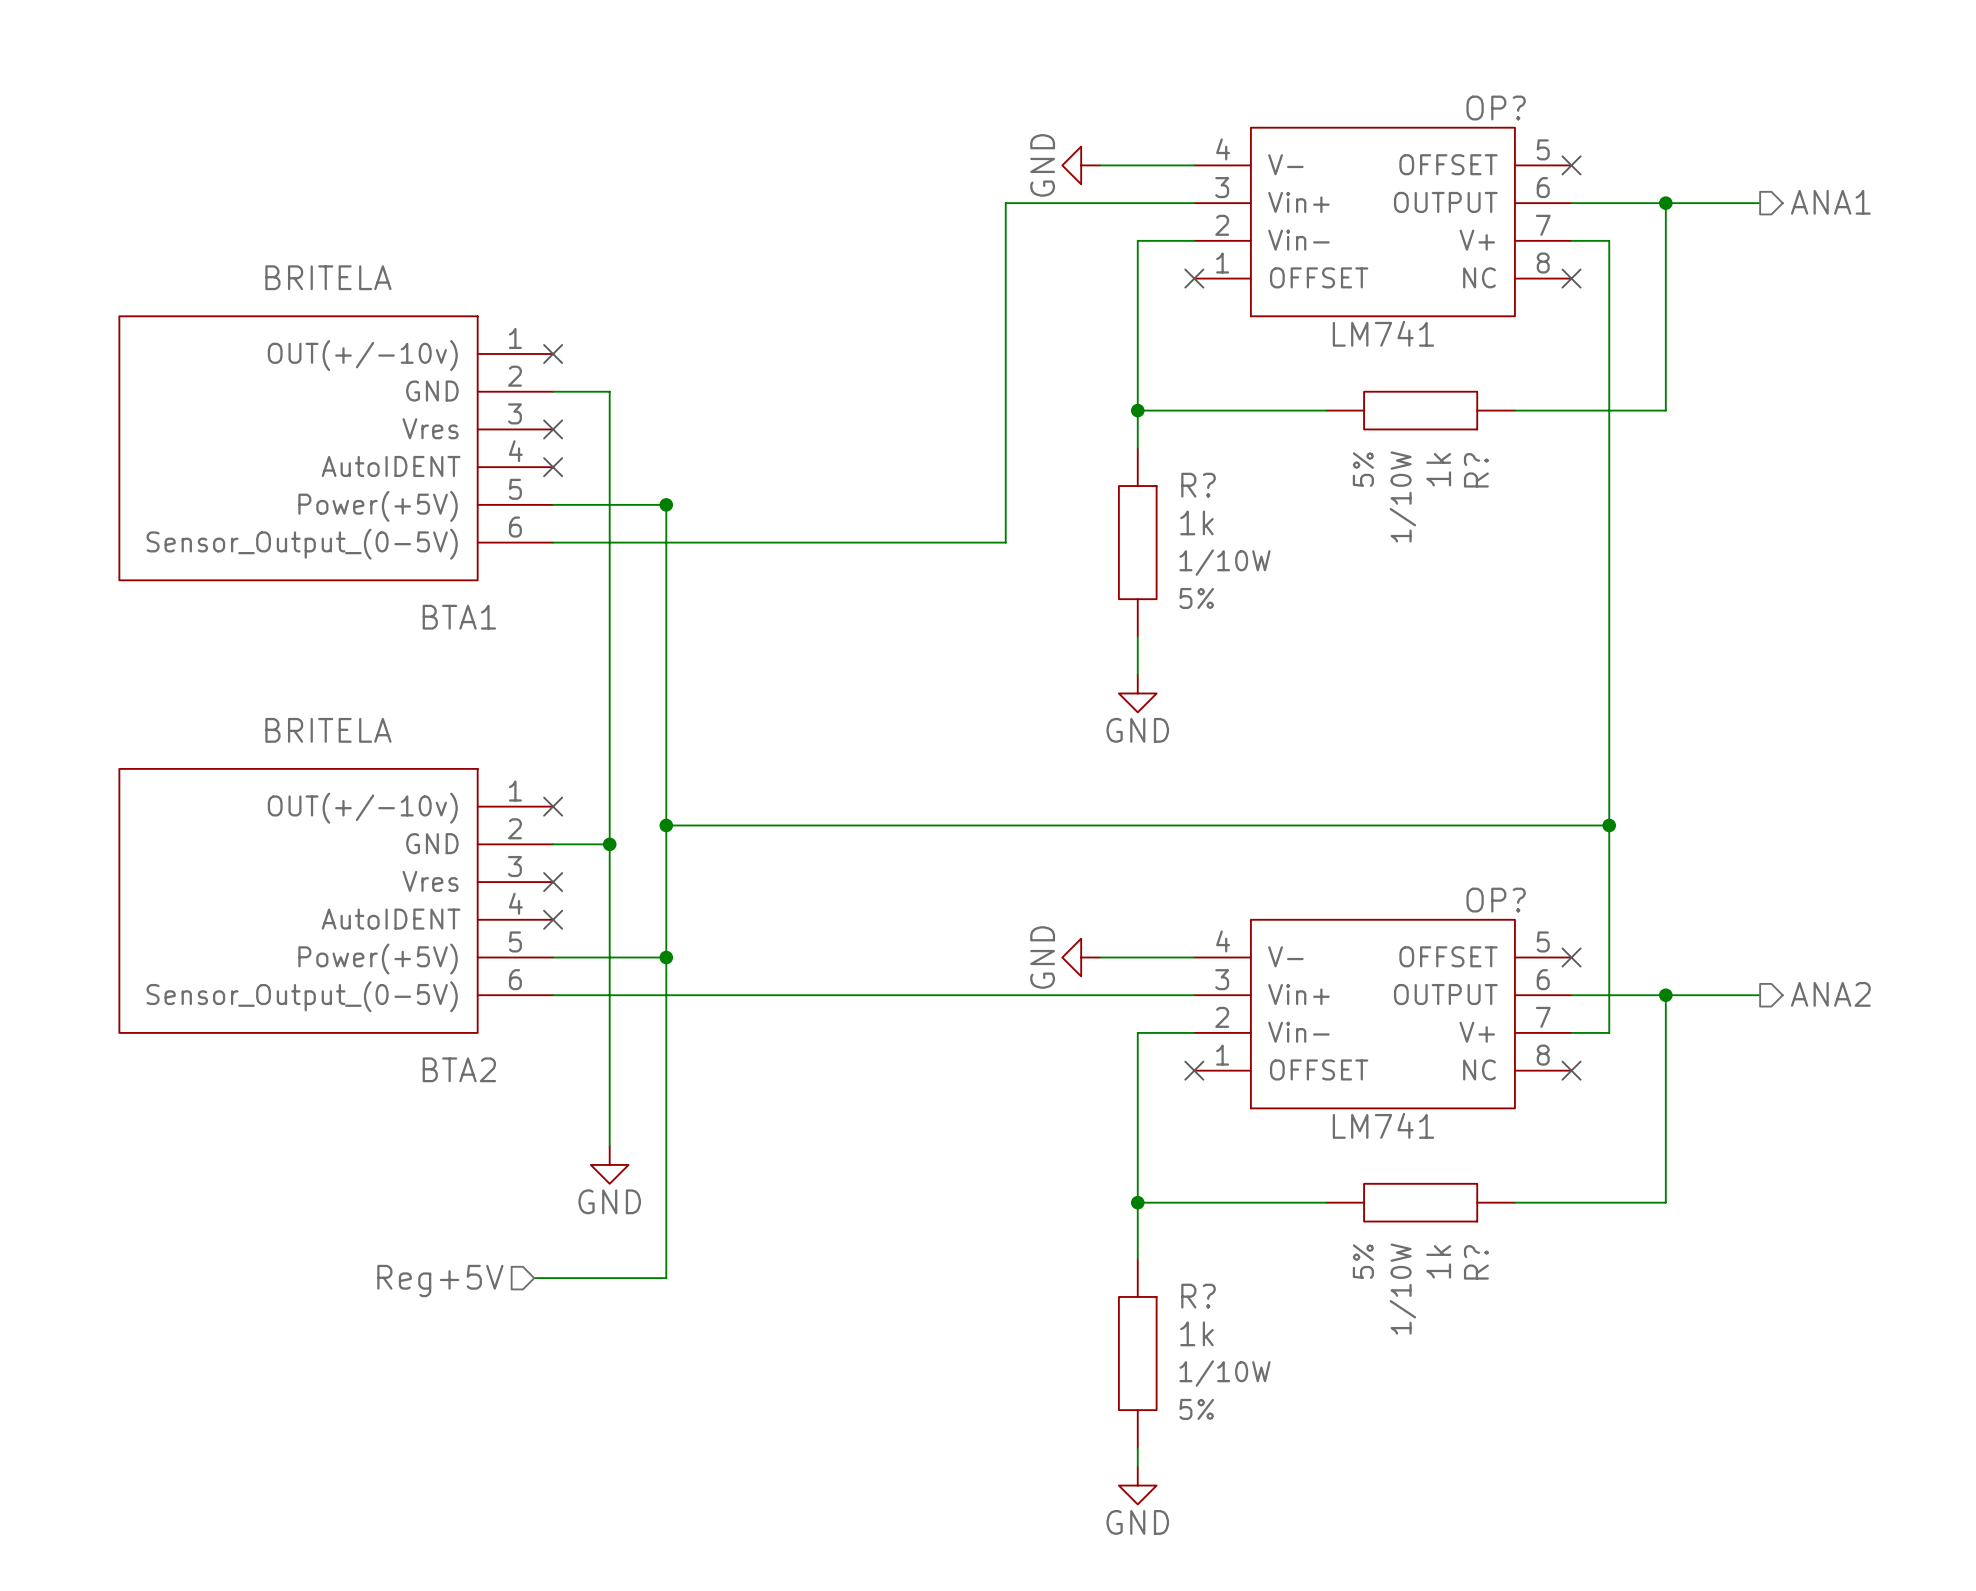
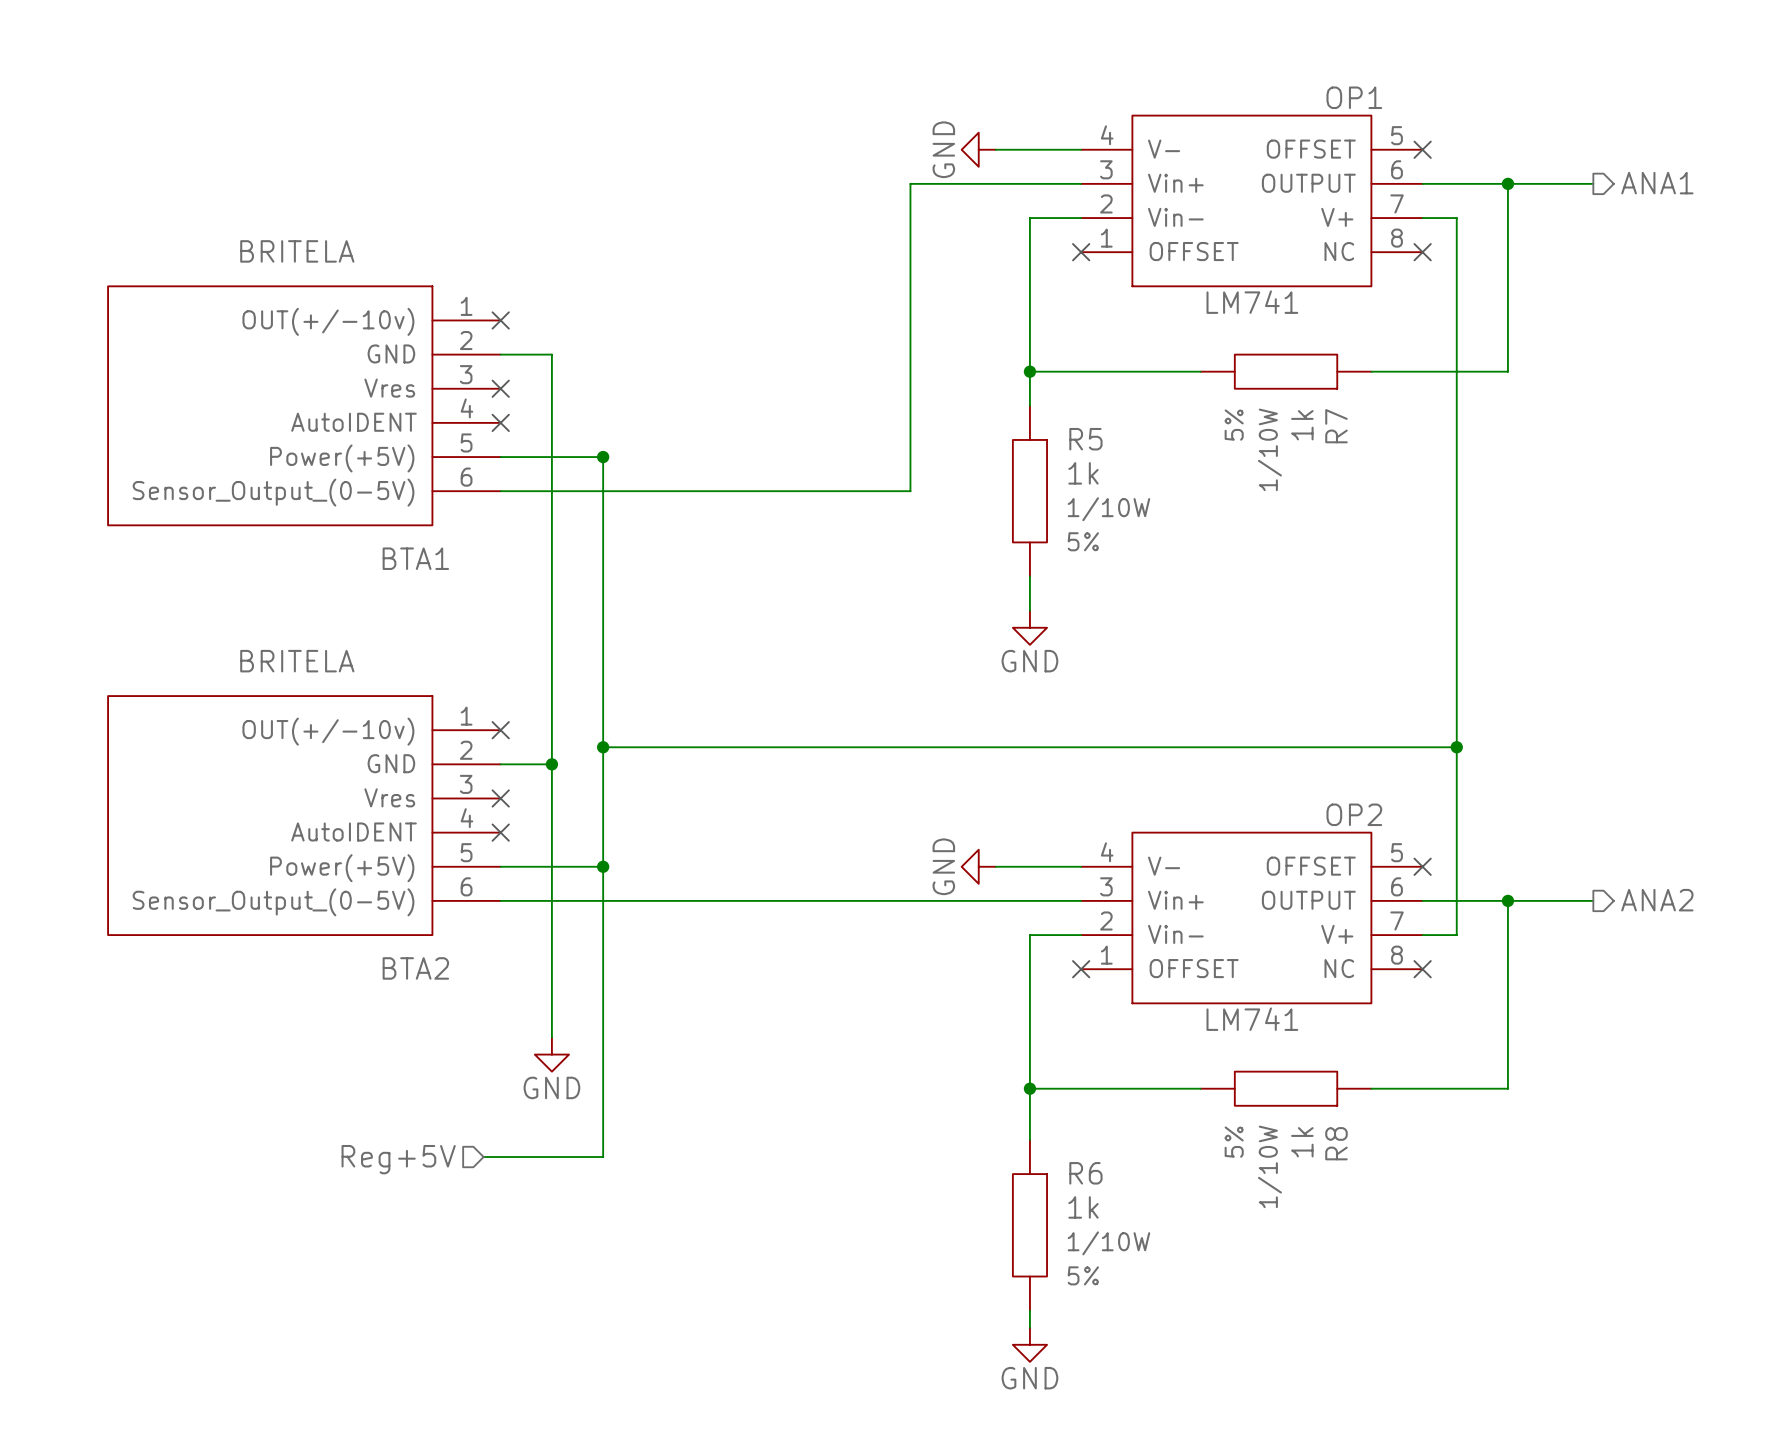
OP? name: OP? (1496, 107) -> OP1 (1354, 97)
R? name: R? (1476, 470) -> R7 (1336, 426)
R? name: R? (1198, 485) -> R5 (1085, 439)
OP? name: OP? (1496, 900) -> OP2 (1354, 814)
R? name: R? (1476, 1262) -> R8 (1336, 1143)
R? name: R? (1198, 1296) -> R6 (1085, 1173)

